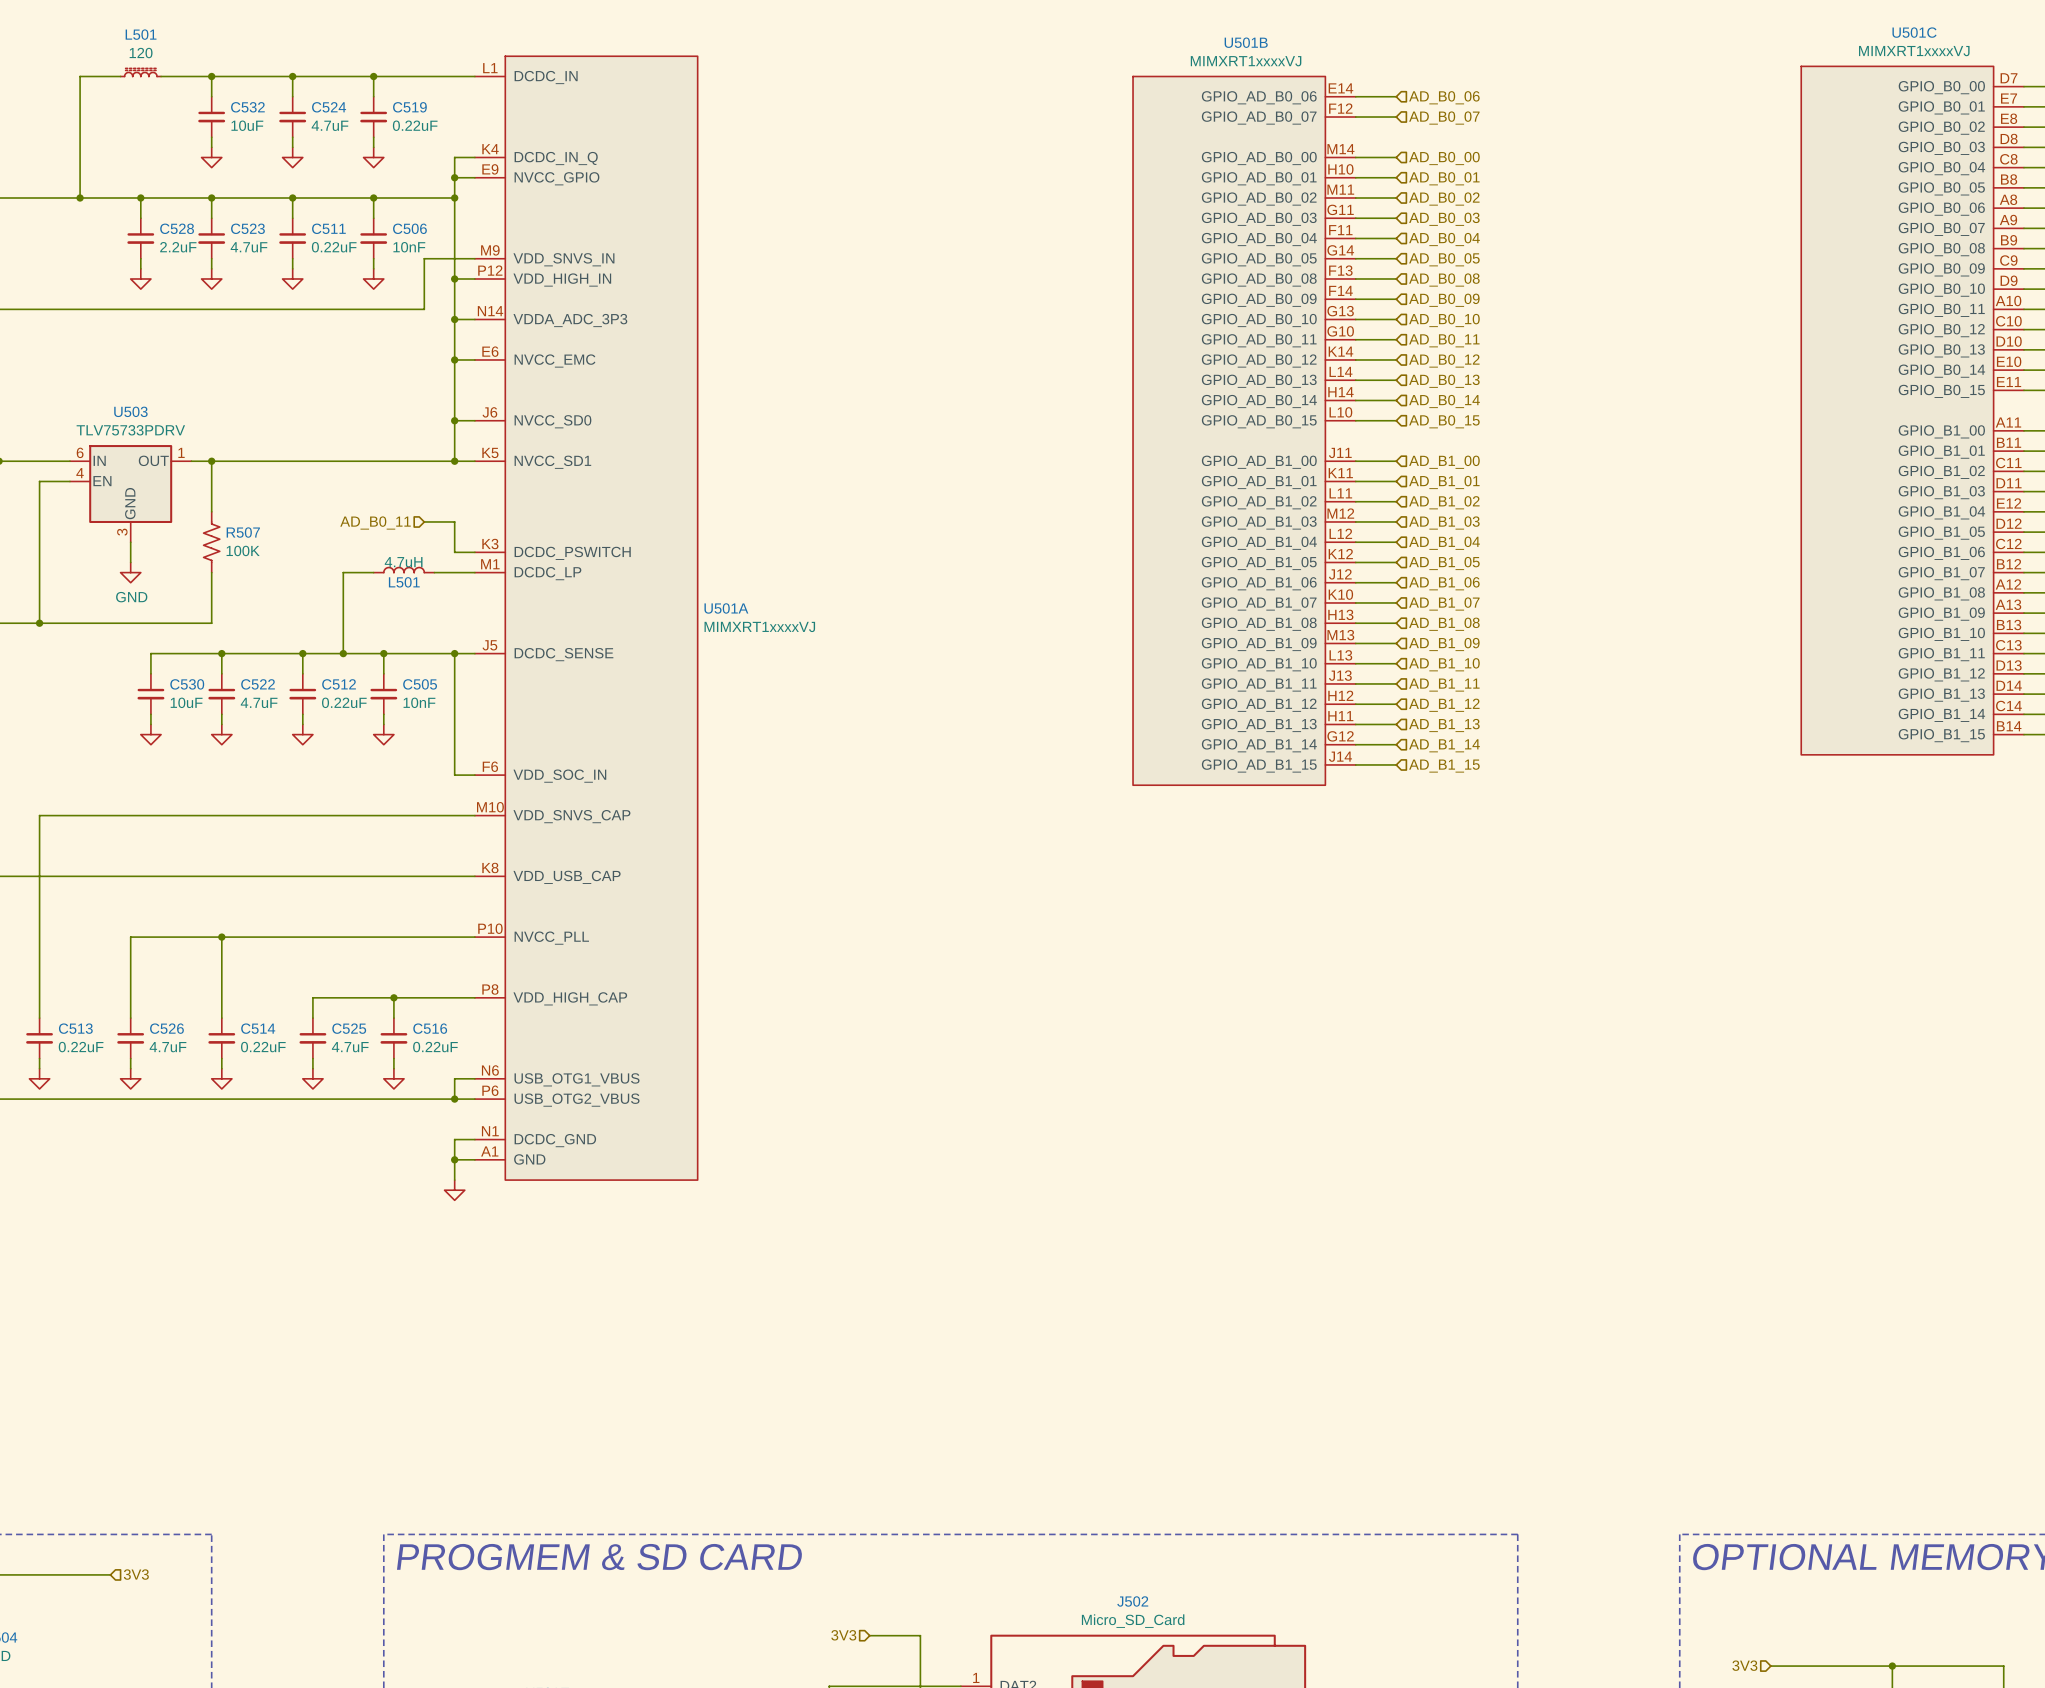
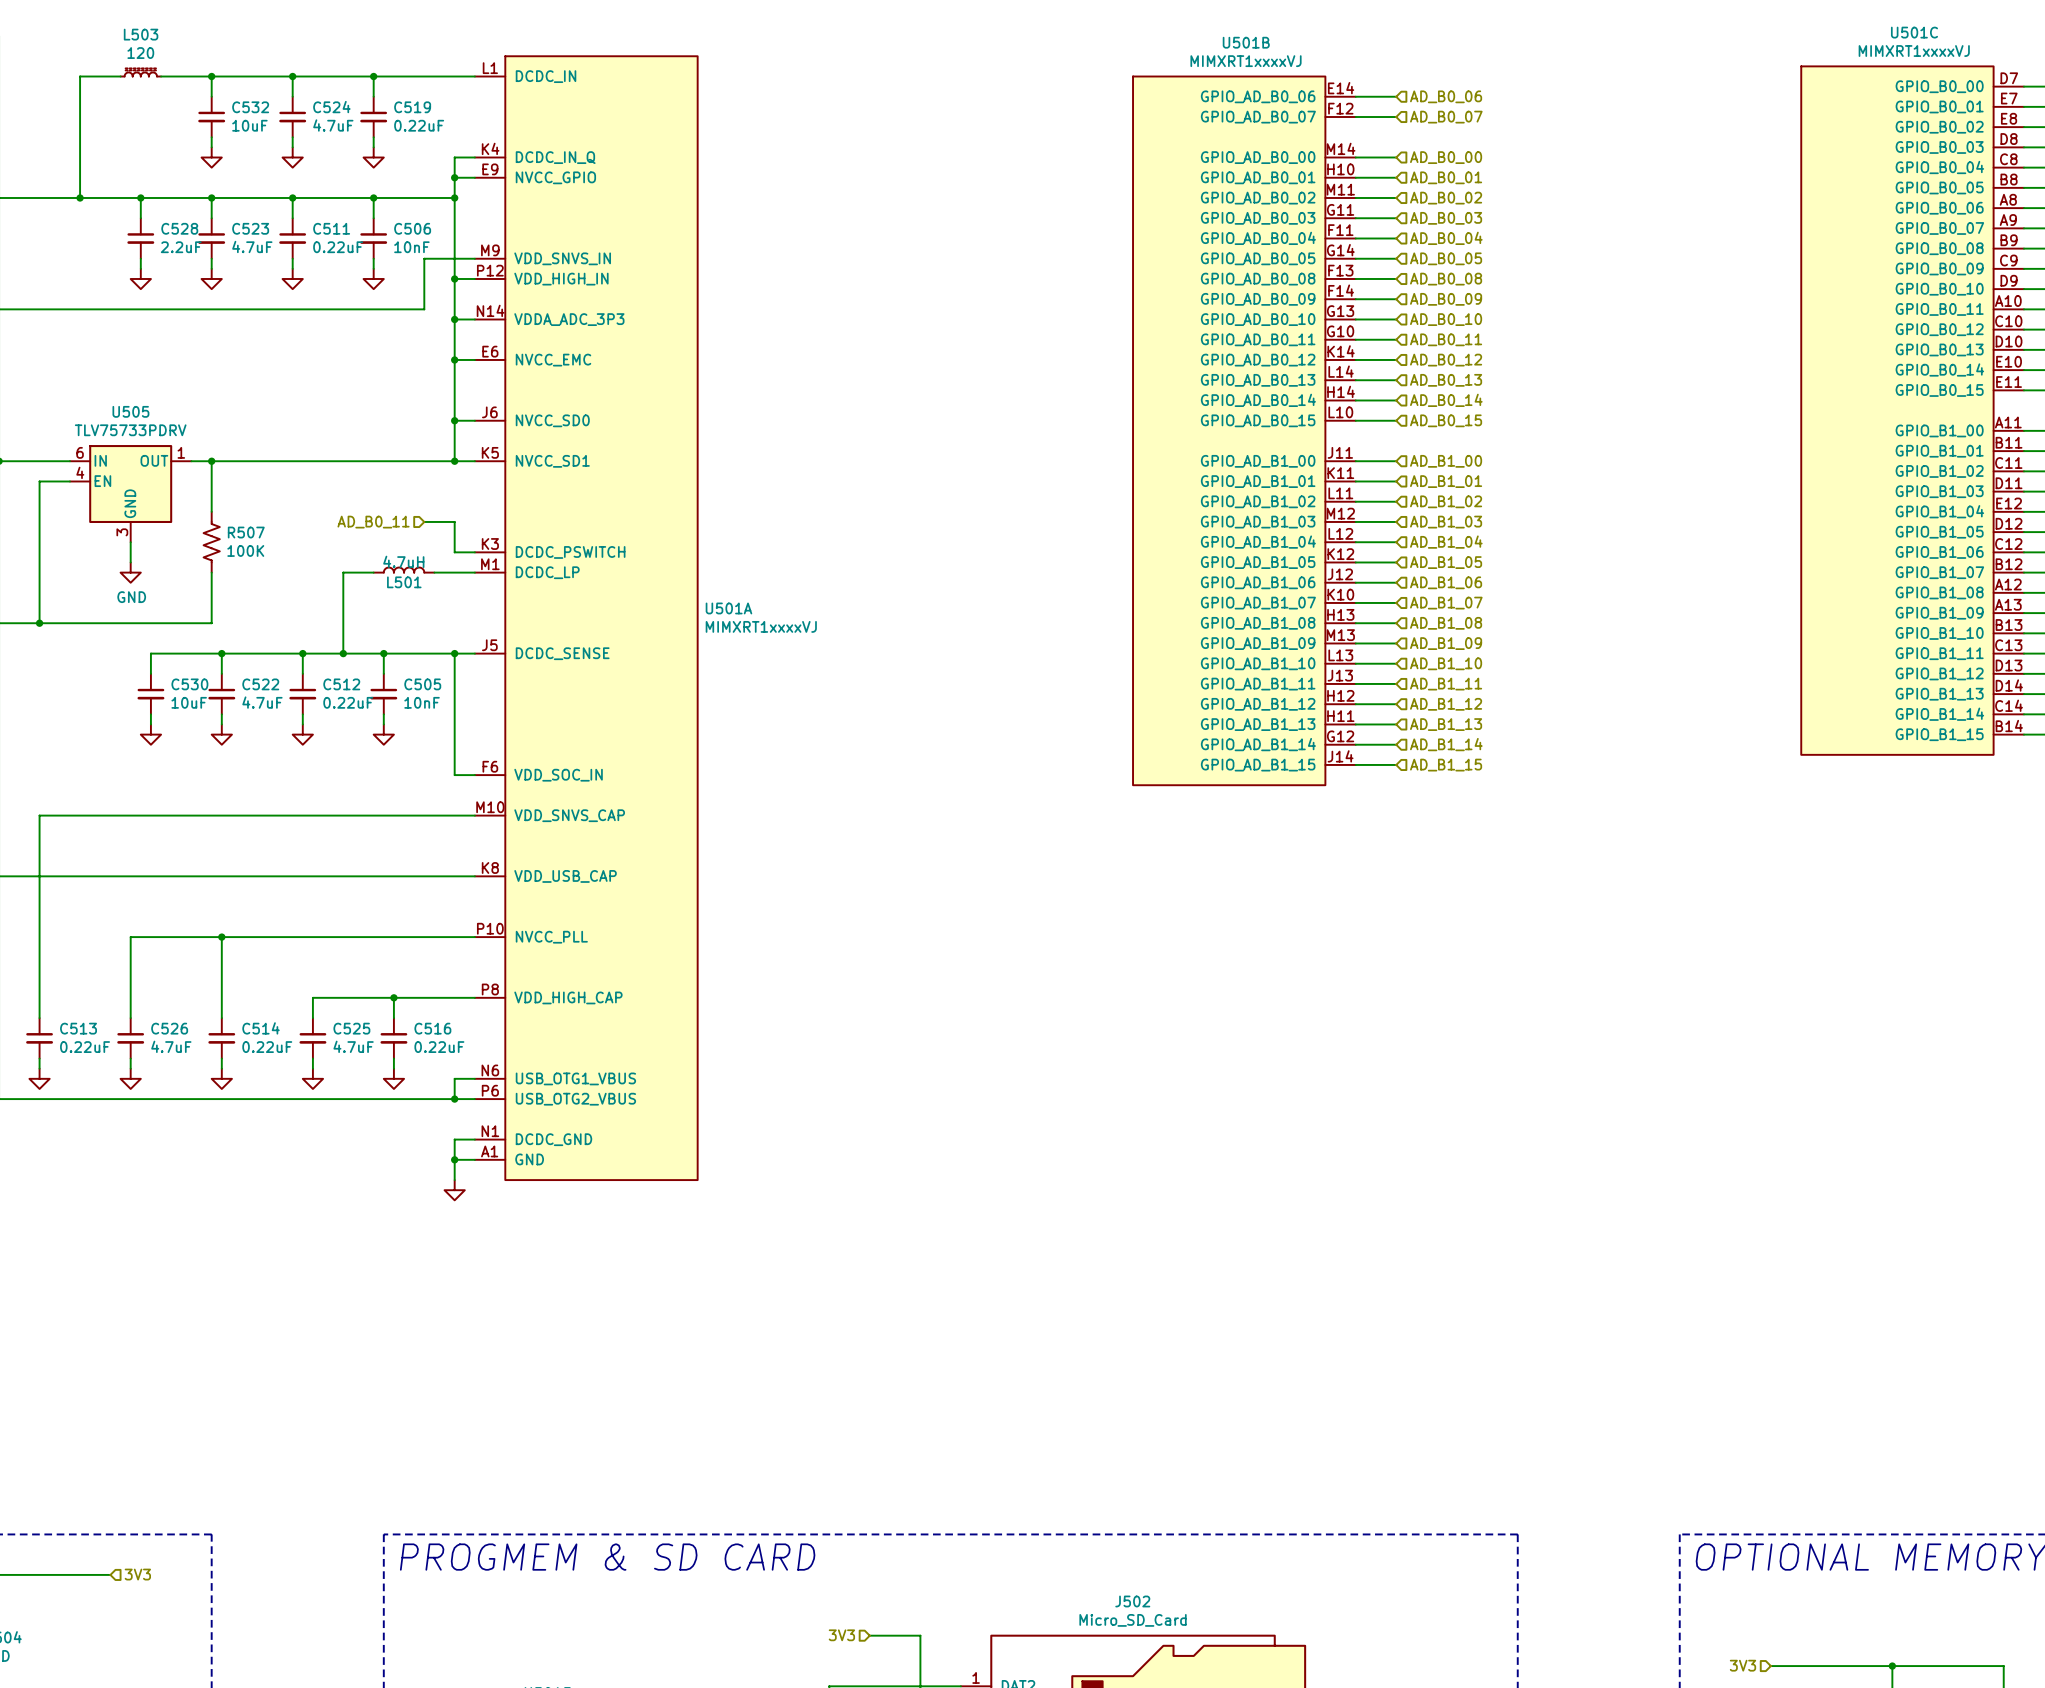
L501 name: L501 (141, 34) -> L503 (141, 34)
U503 name: U503 (130, 411) -> U505 (130, 411)

